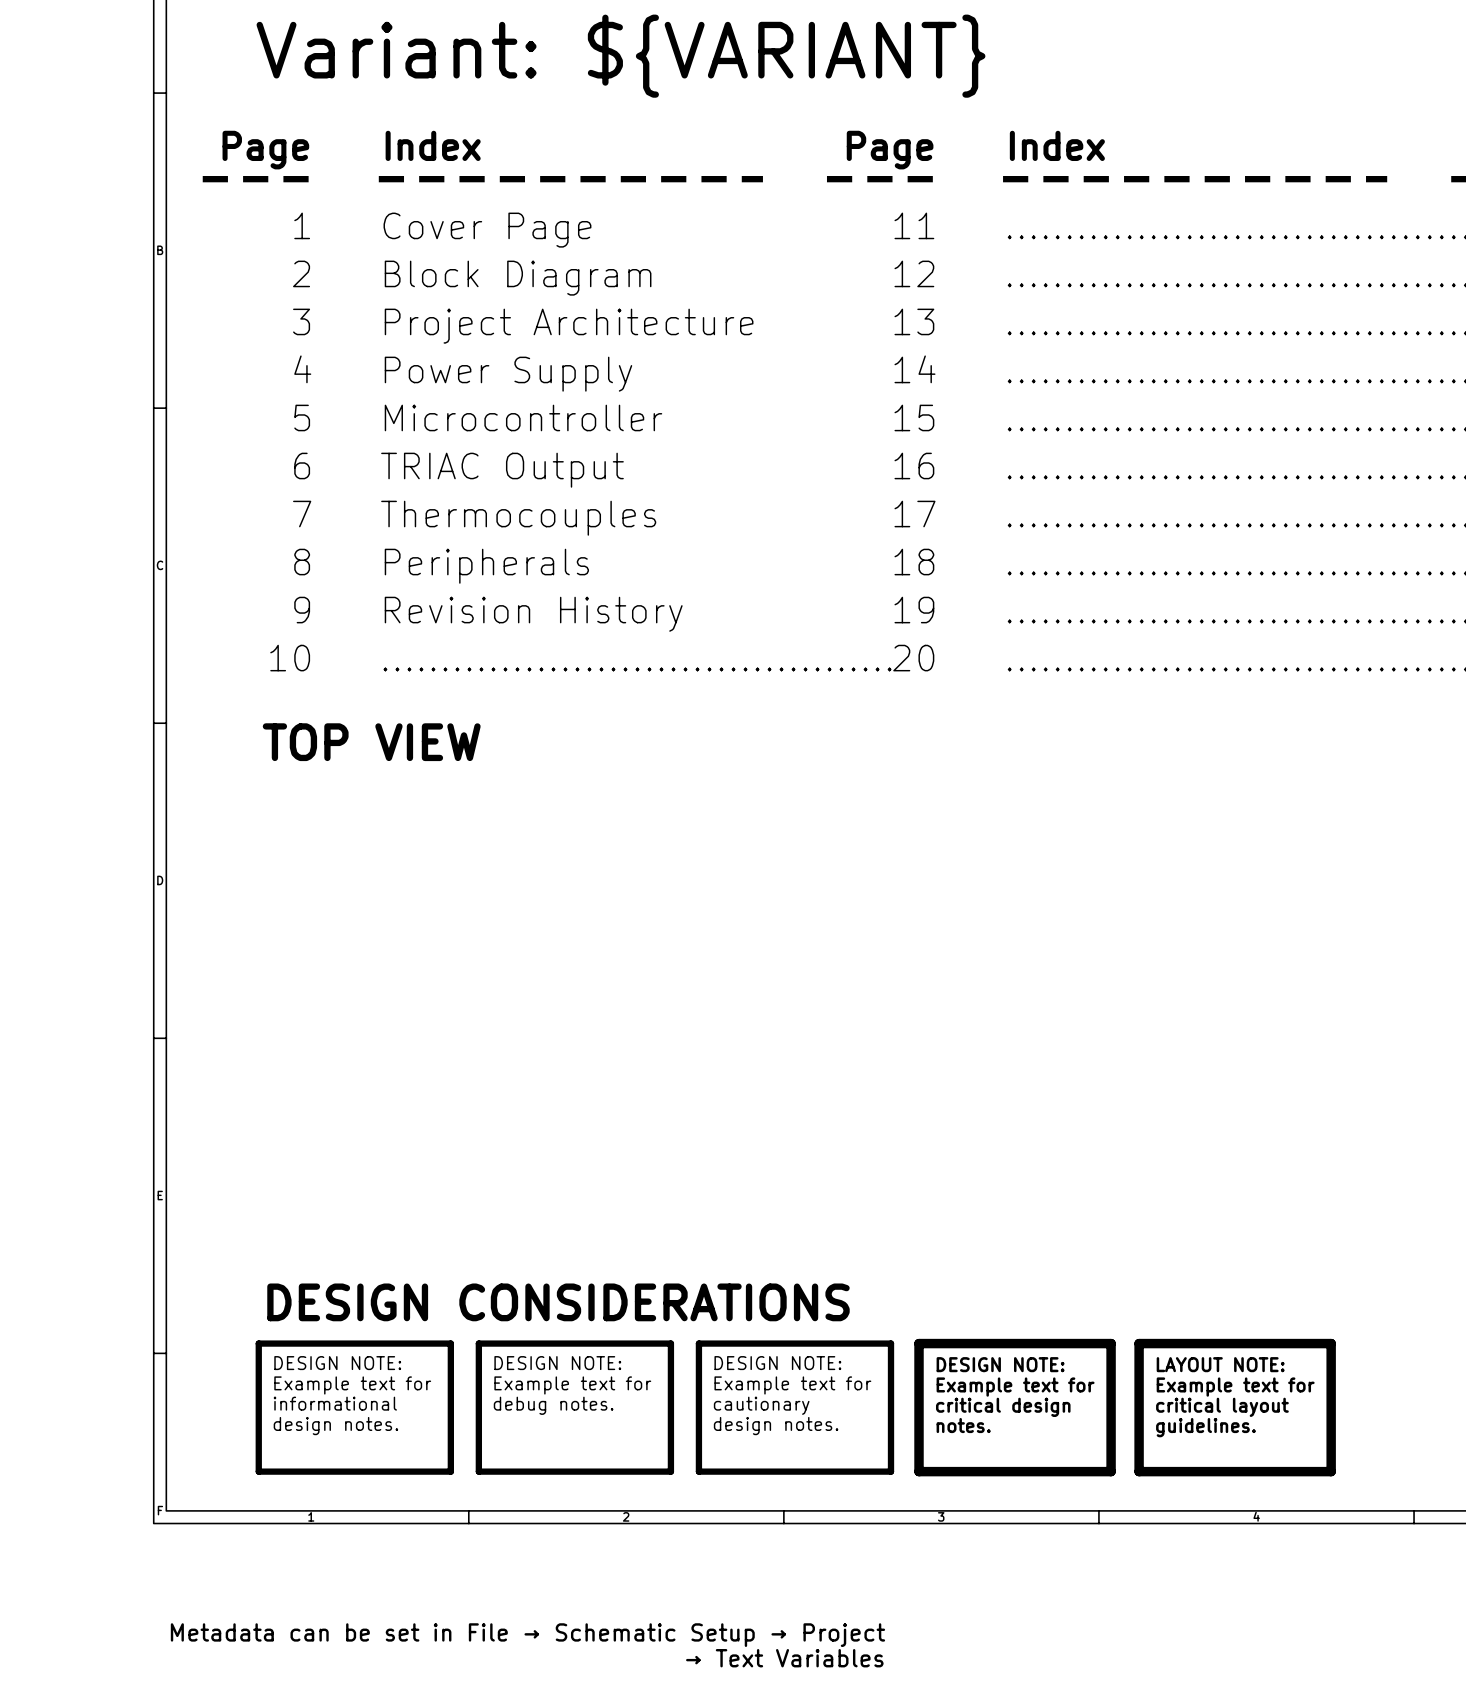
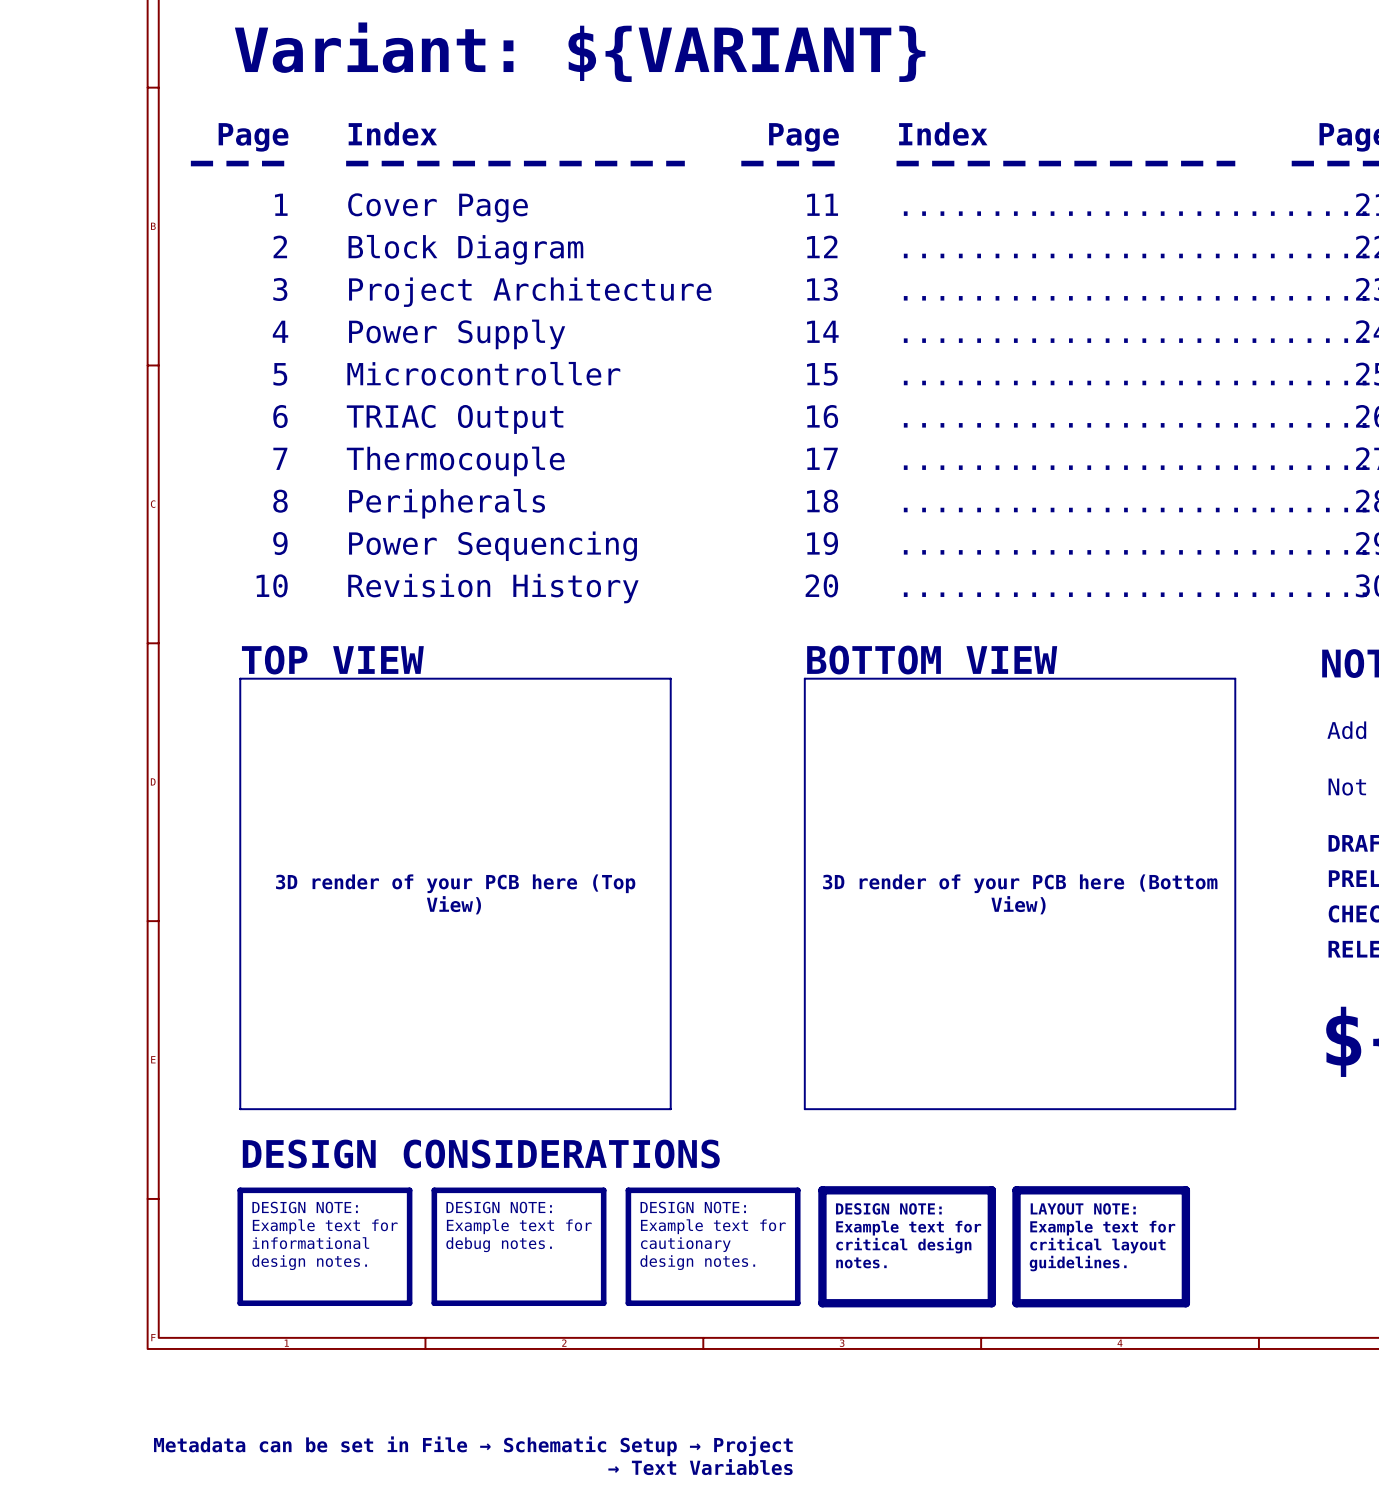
text: Thermocouples (518, 518) -> Thermocouple (455, 461)
text: Revision History (533, 614) -> Power Sequencing (492, 546)
text: ........................................... (637, 669) -> Revision History (493, 588)
text: none -> BOTTOM VIEW (932, 660)
line: none -> (240, 678) (670, 678) (670, 1109) (240, 1109) (240, 678)
line: none -> (804, 678) (1235, 678) (1235, 1109) (804, 1109) (804, 678)
text: none -> 3D render of your PCB here (Top (455, 883)
text: none -> 3D render of your PCB here (Bottom (1020, 883)
text: none -> View) (453, 905)
text: none -> View) (1018, 905)

